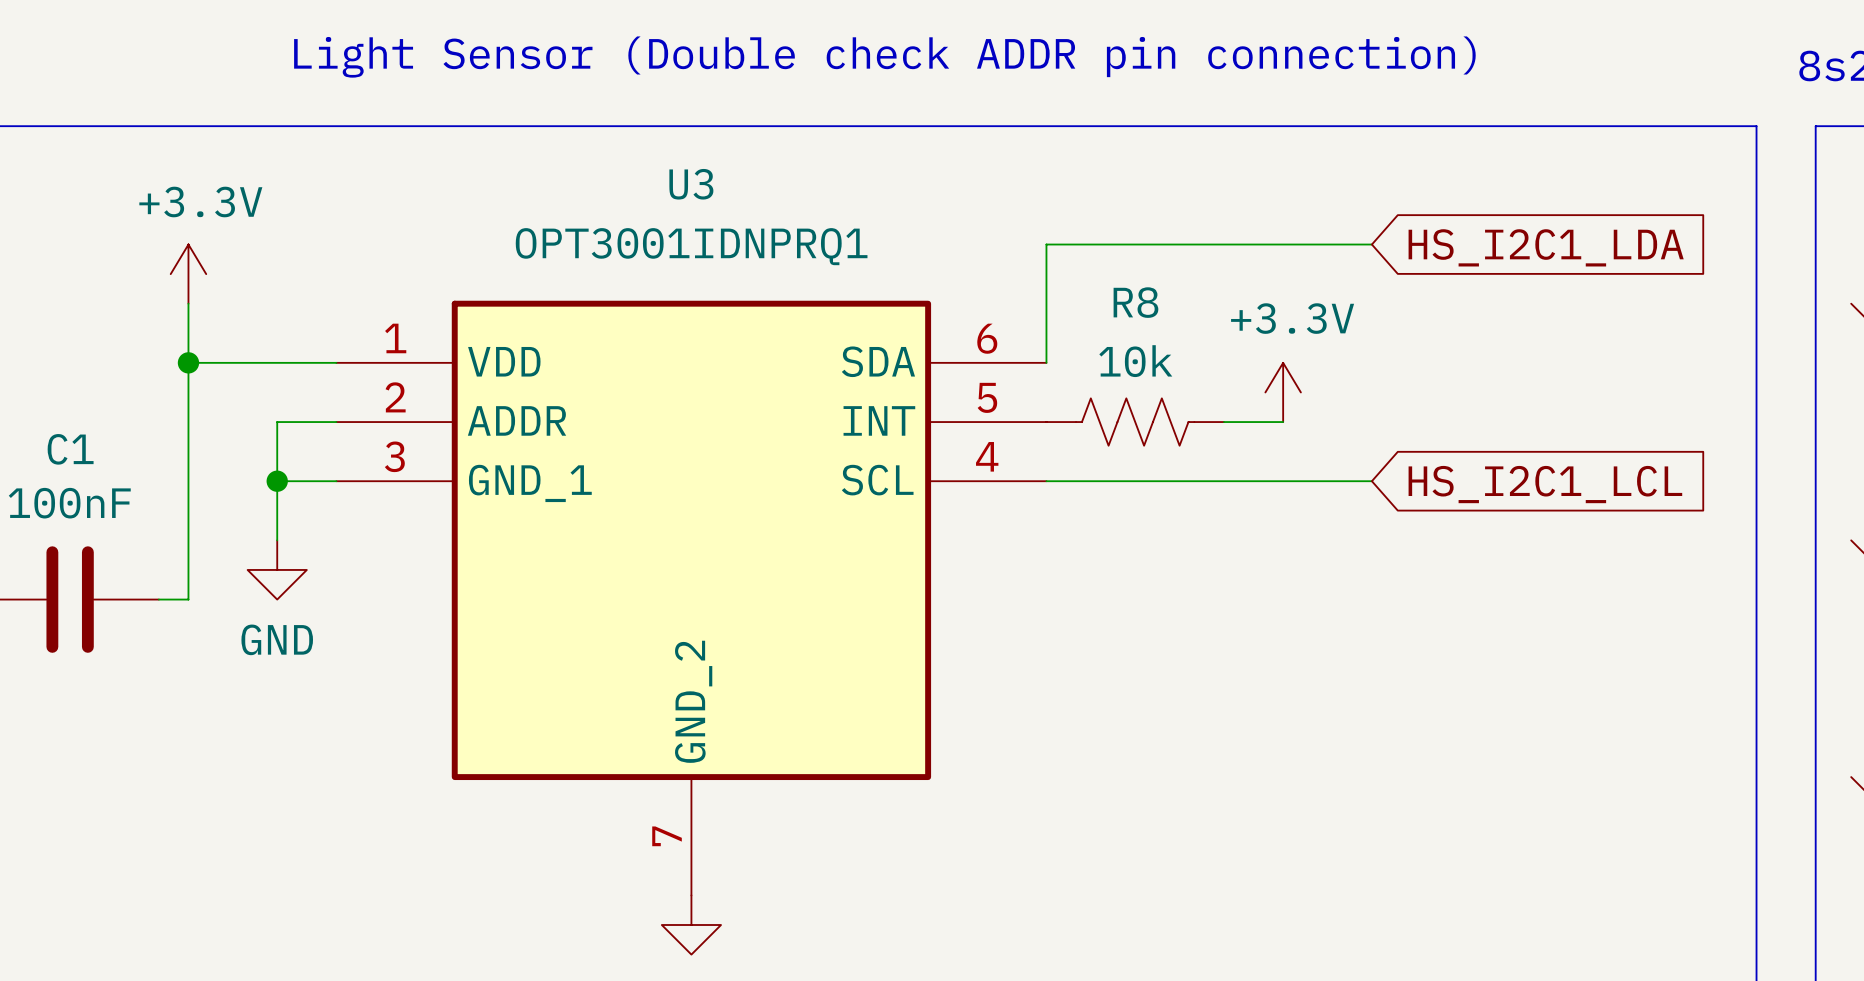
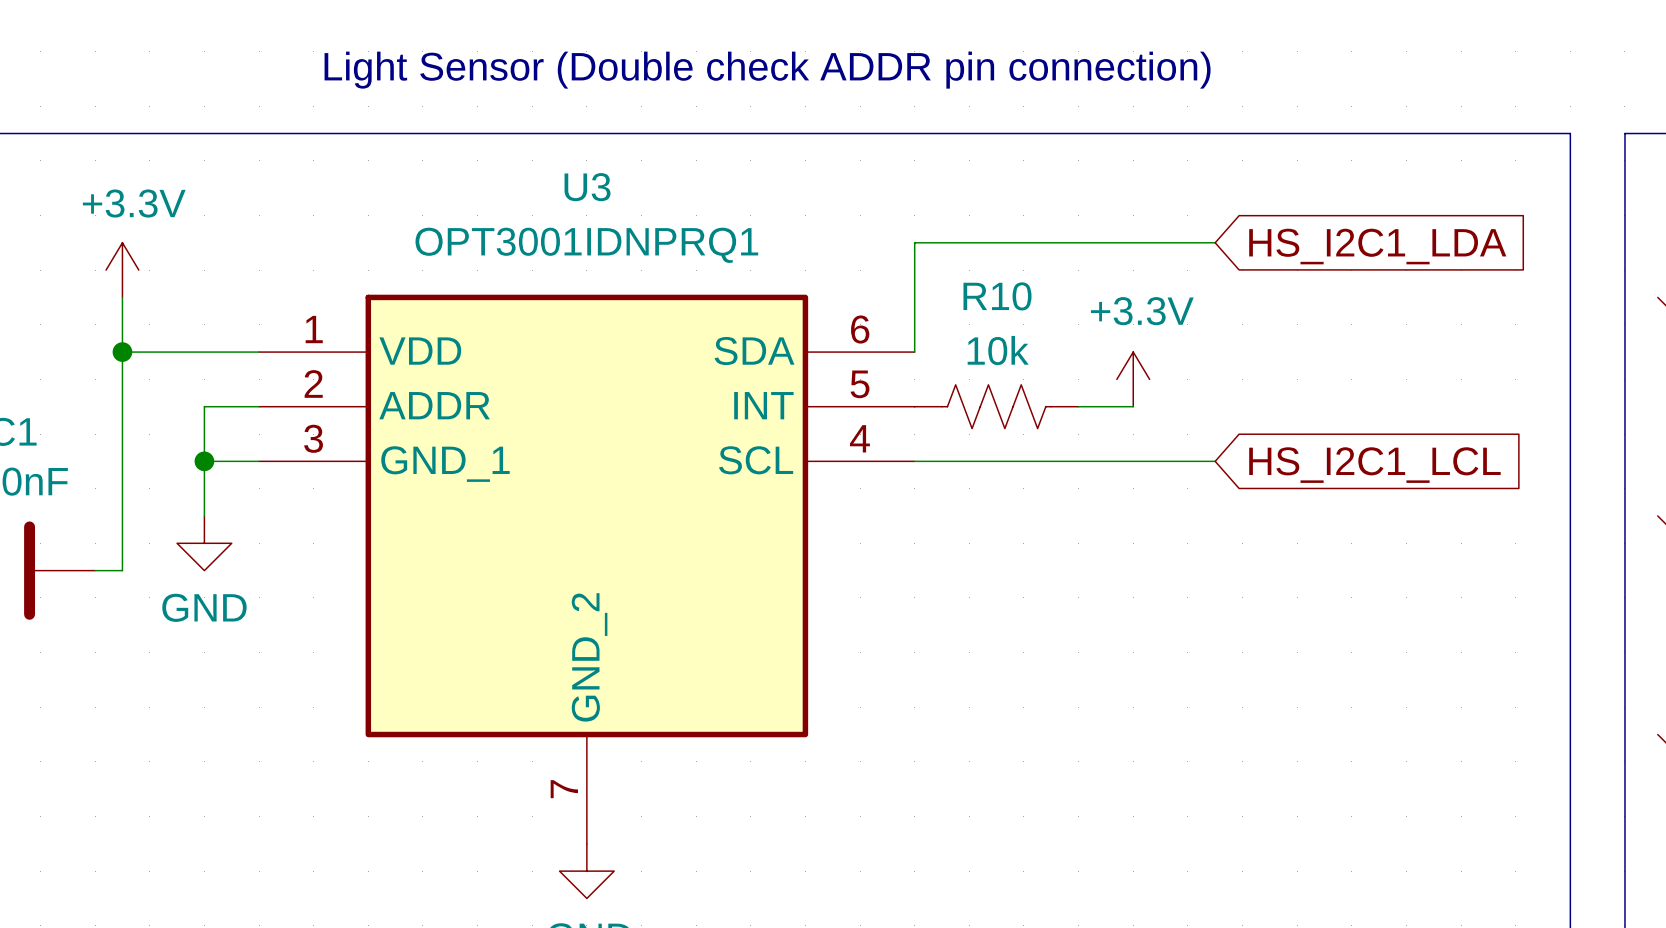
R8 name: R8 (1135, 302) -> R10 (997, 296)

